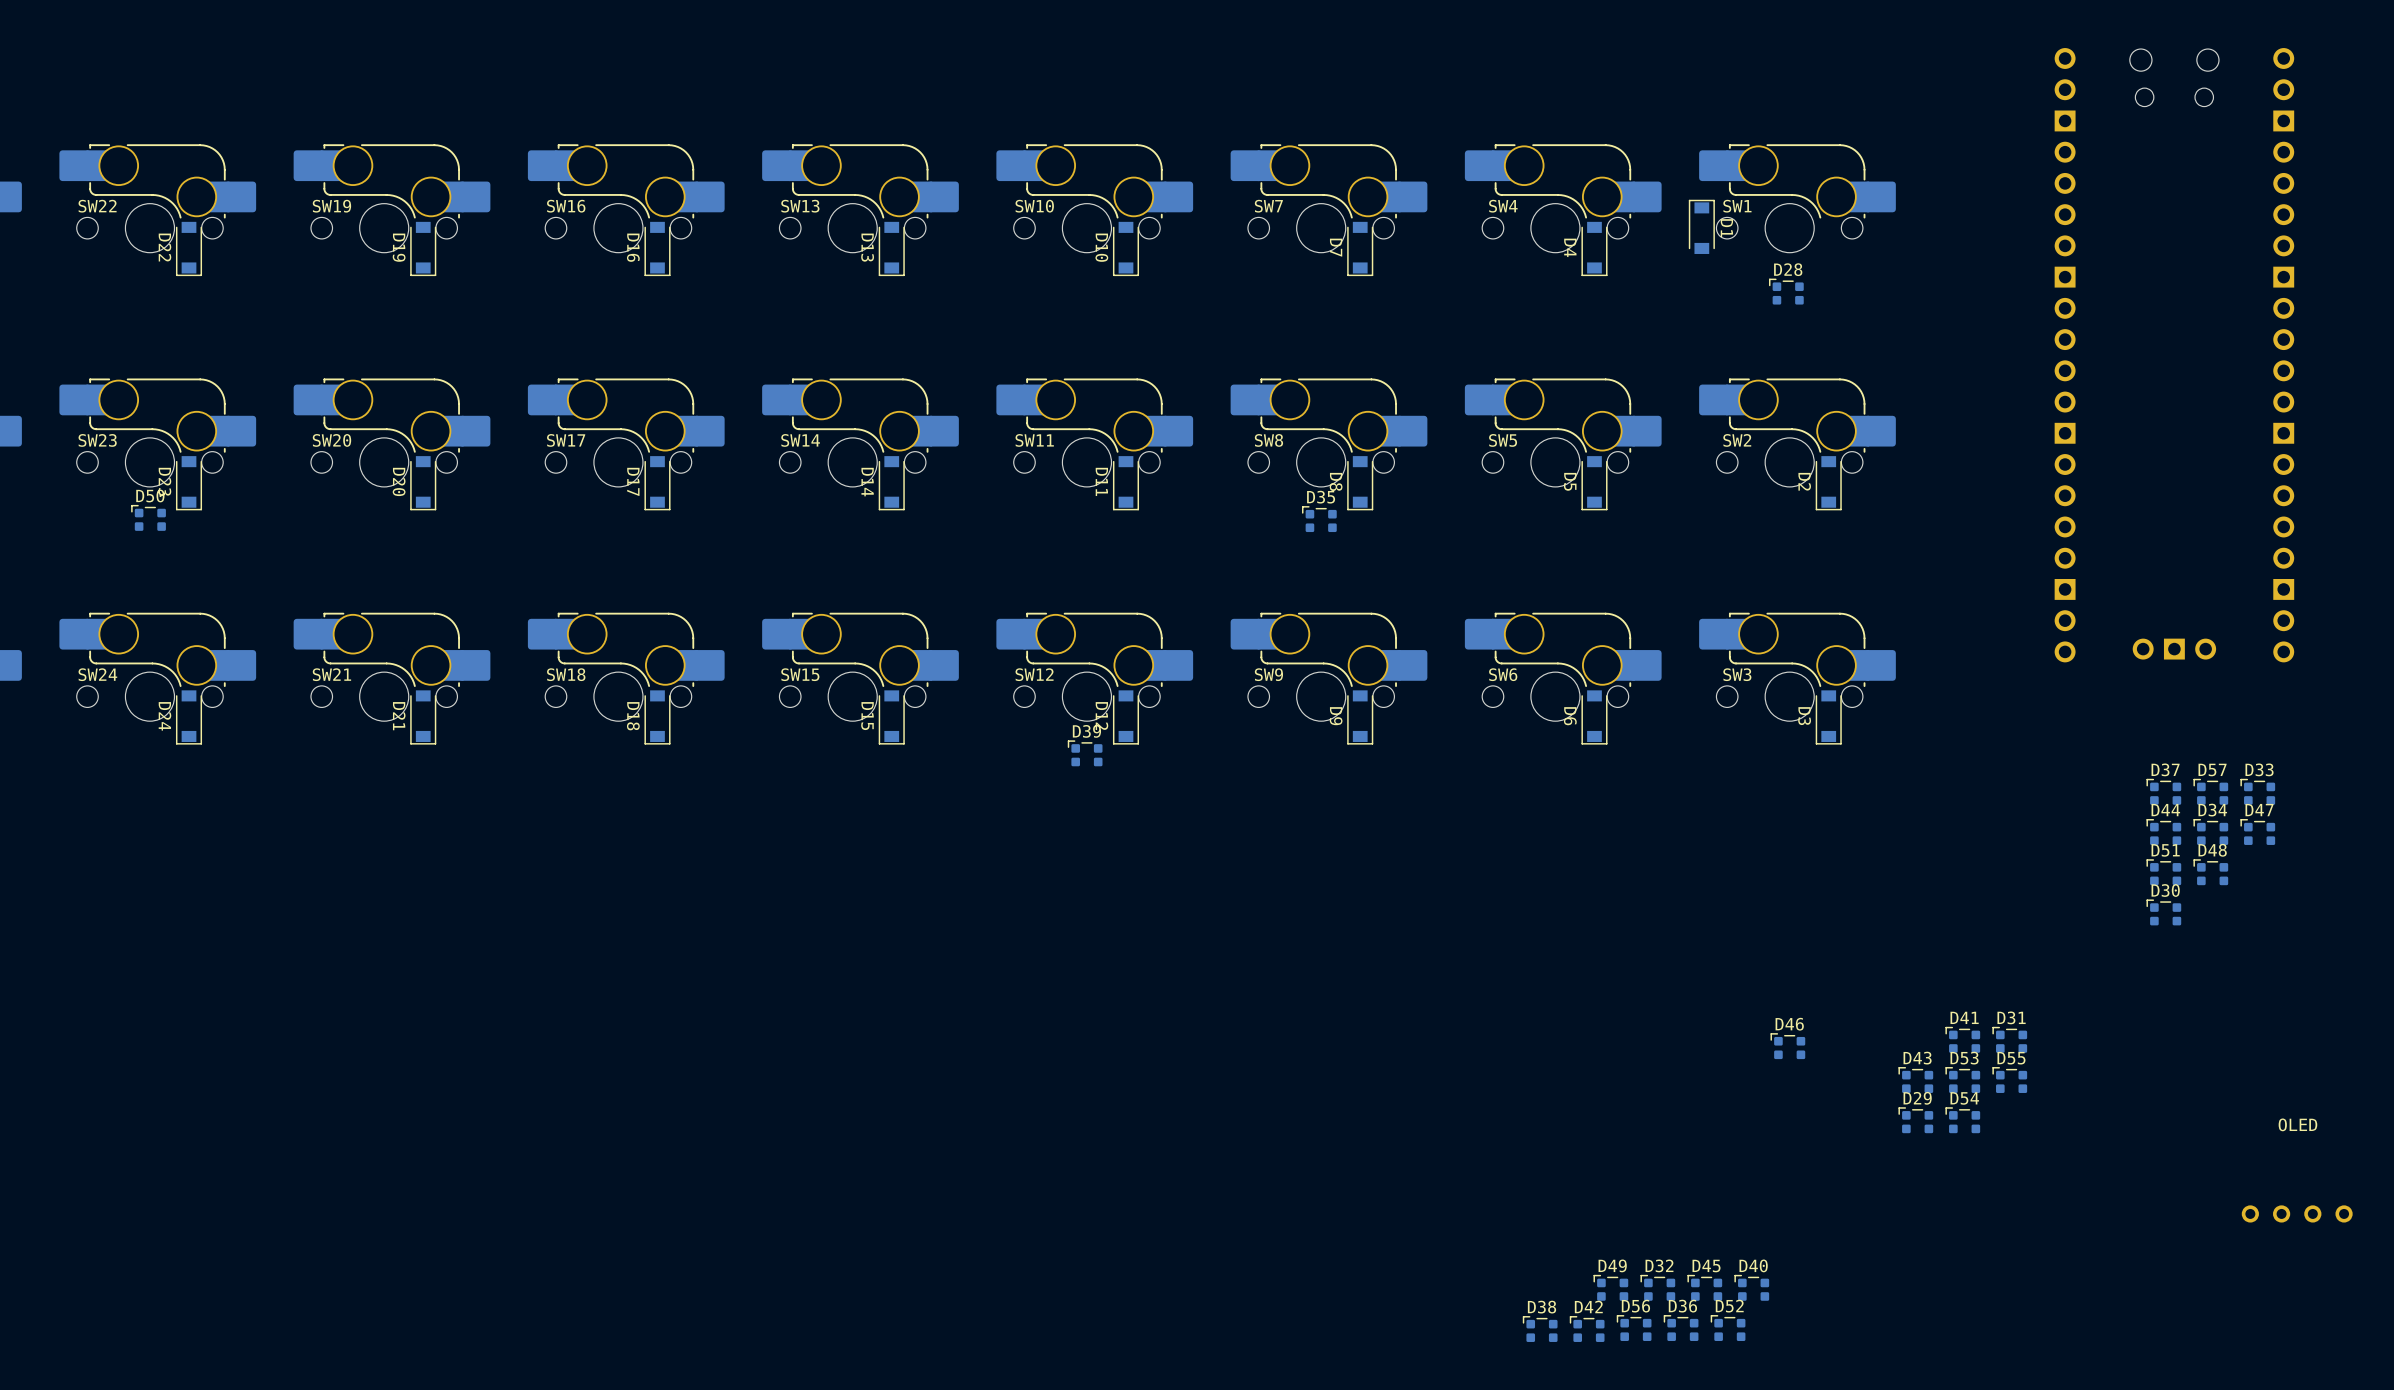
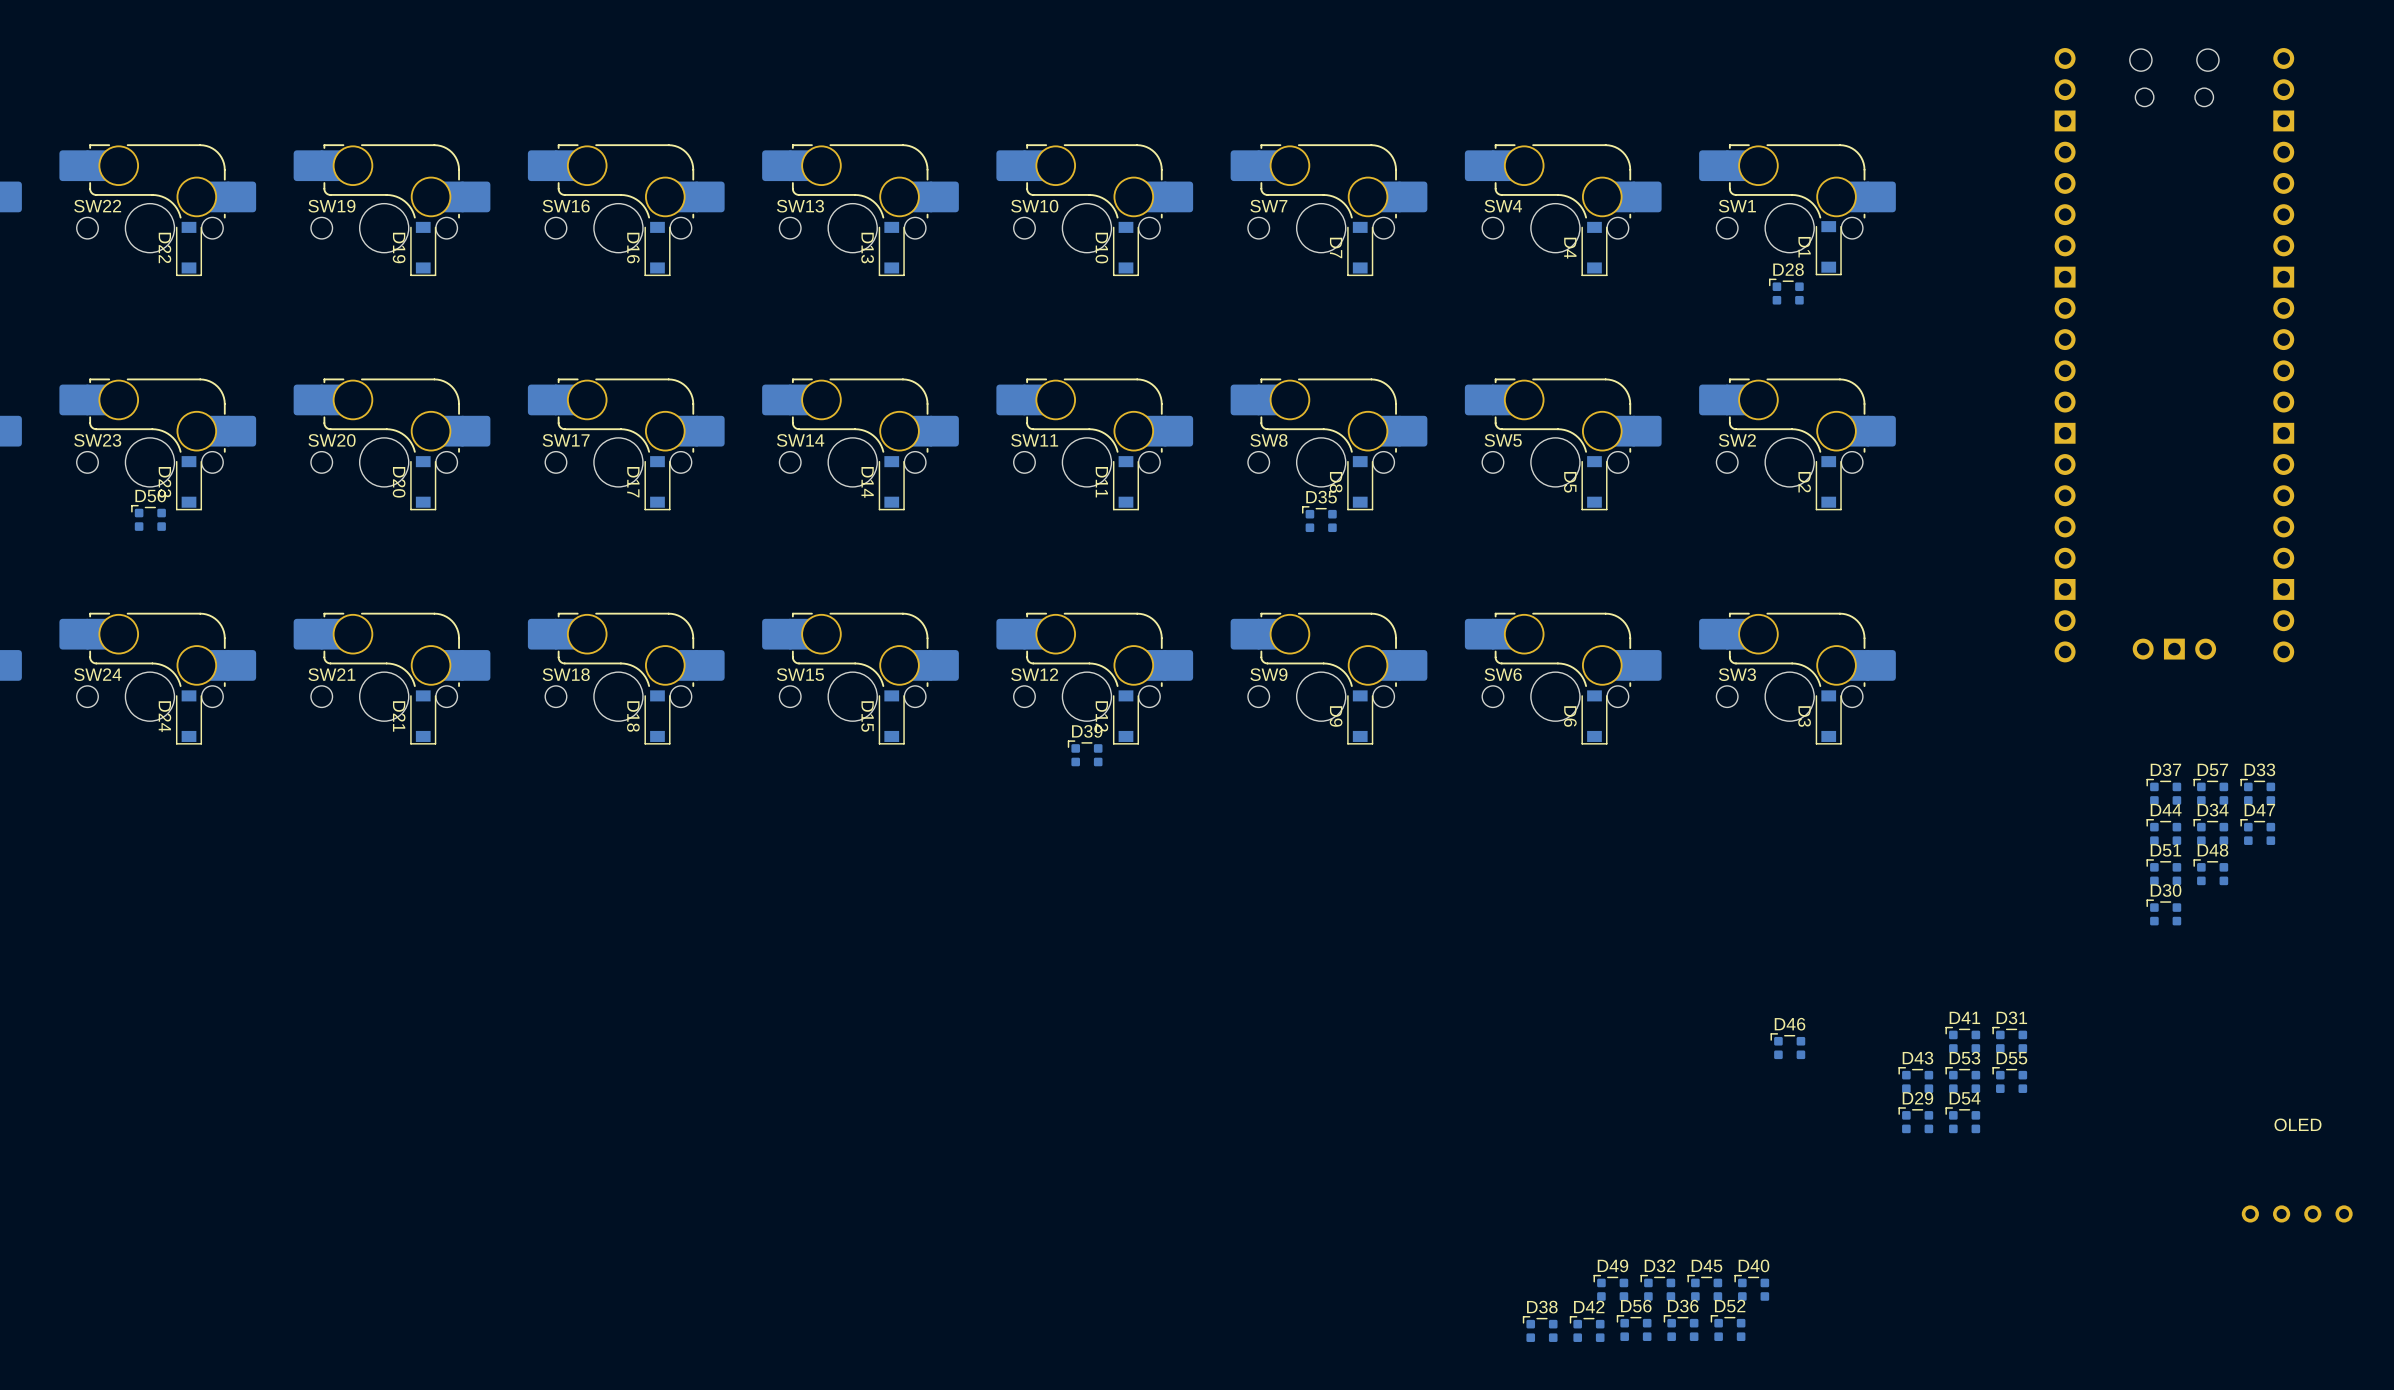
D1 rotation: 0° (1701, 226) -> 180° (1828, 248)
D1 position: (1701, 226) -> (1828, 248)

